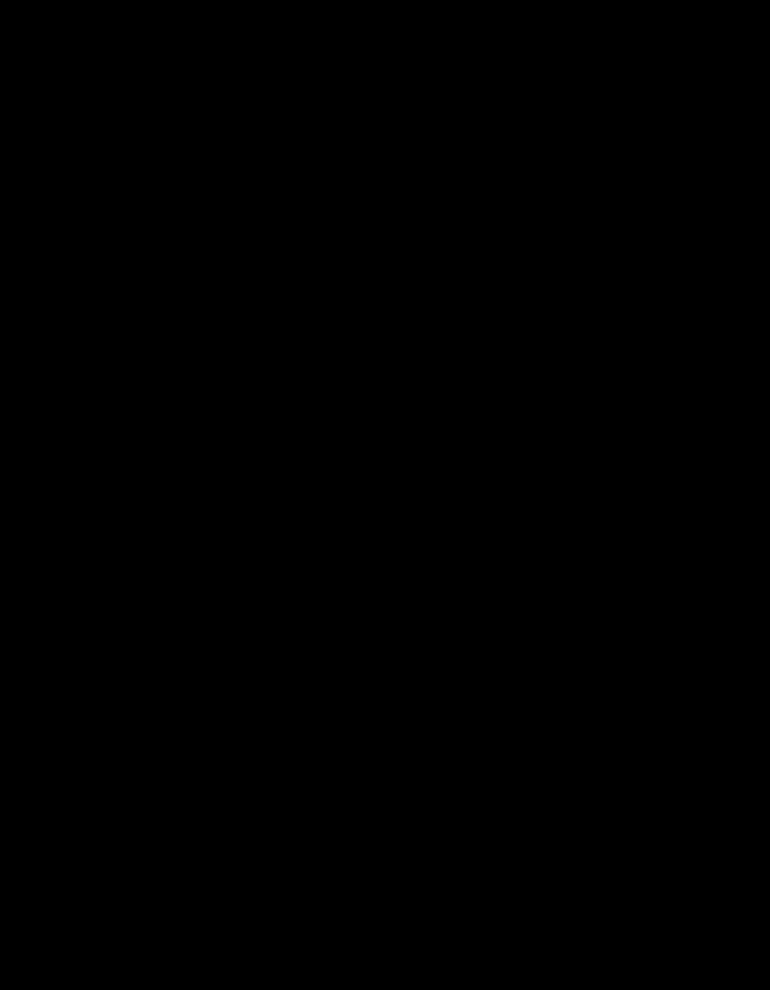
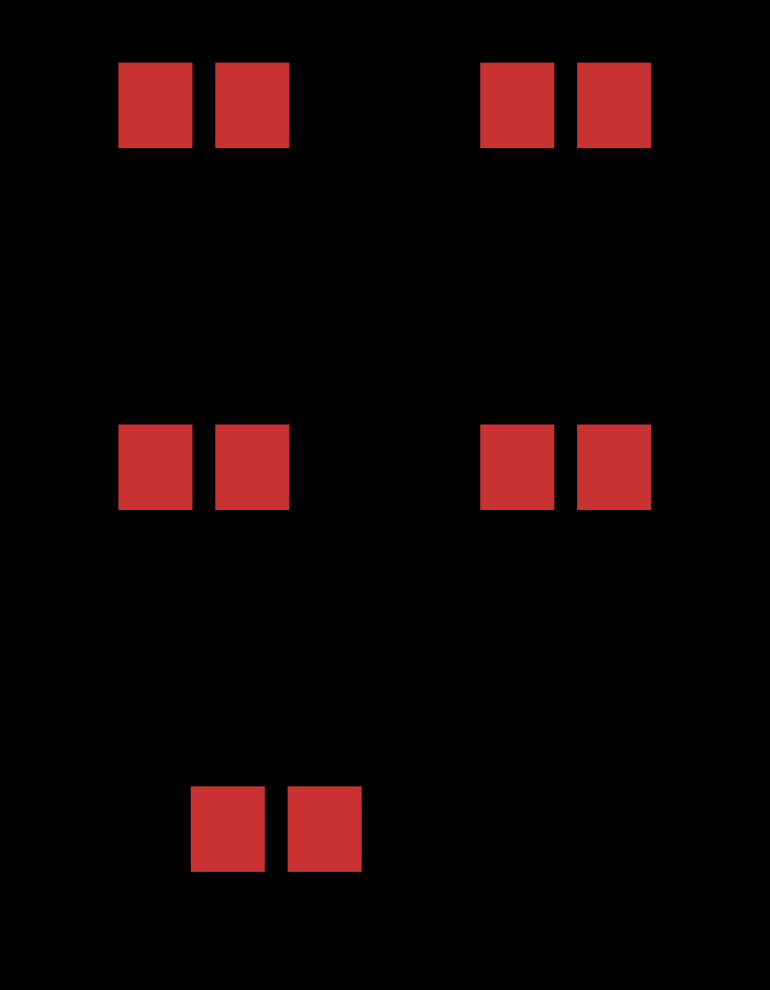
part: none -> (203, 105)
part: none -> (565, 105)
part: none -> (203, 467)
part: none -> (565, 467)
part: none -> (276, 829)

